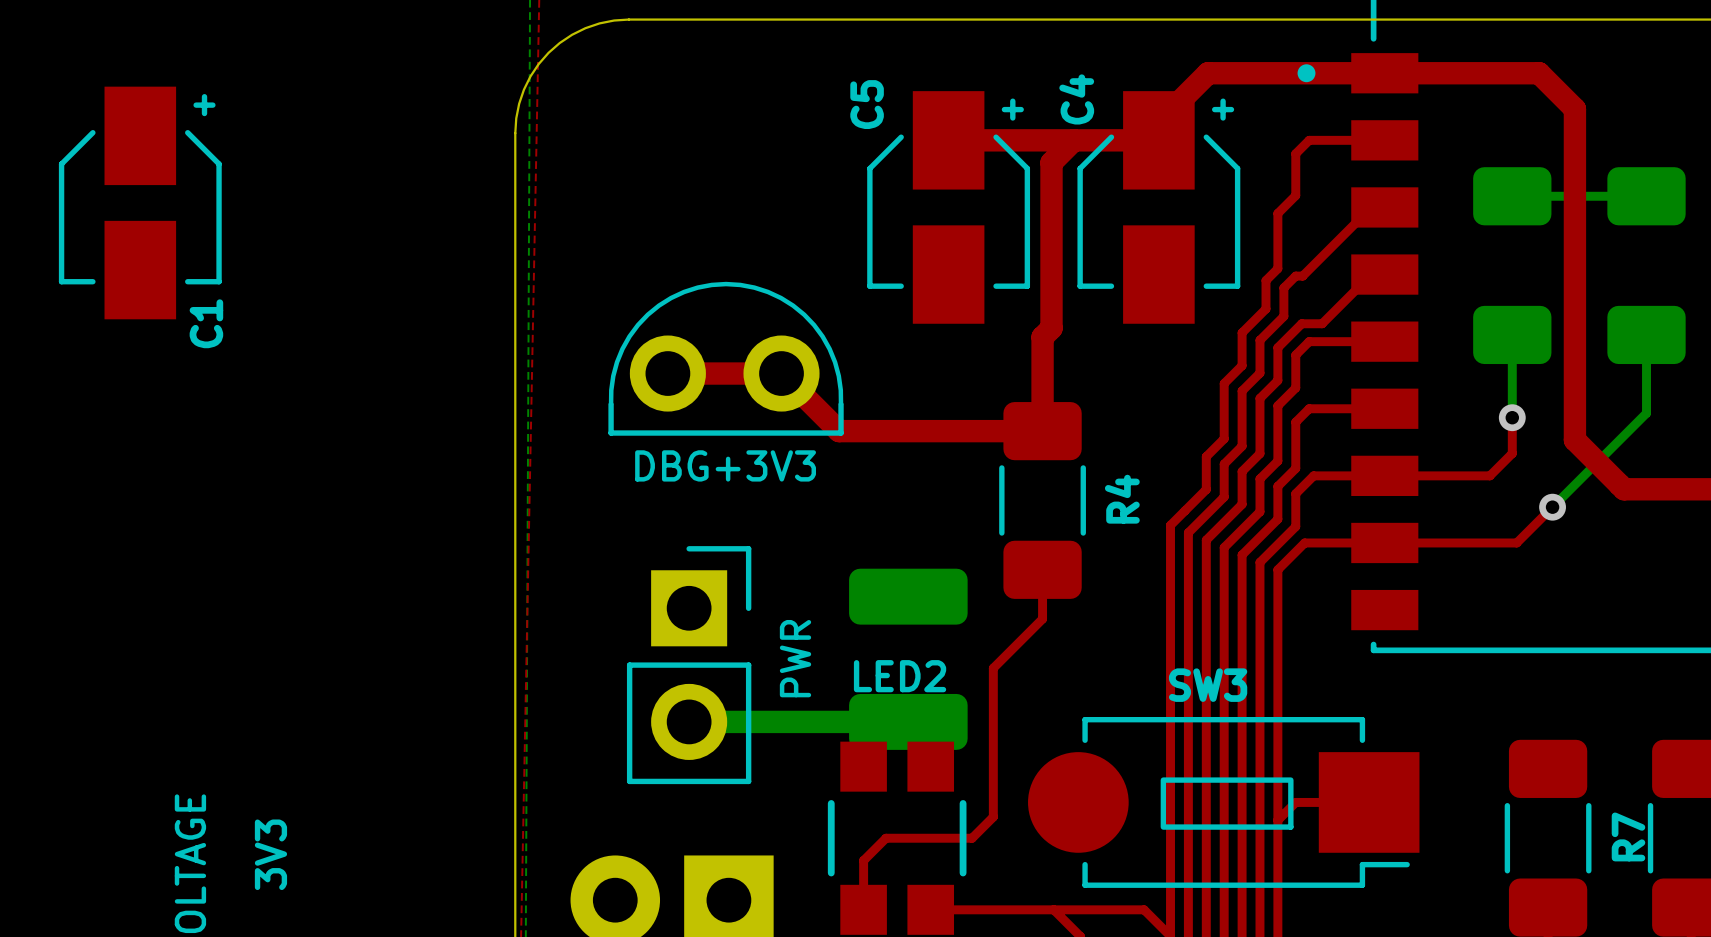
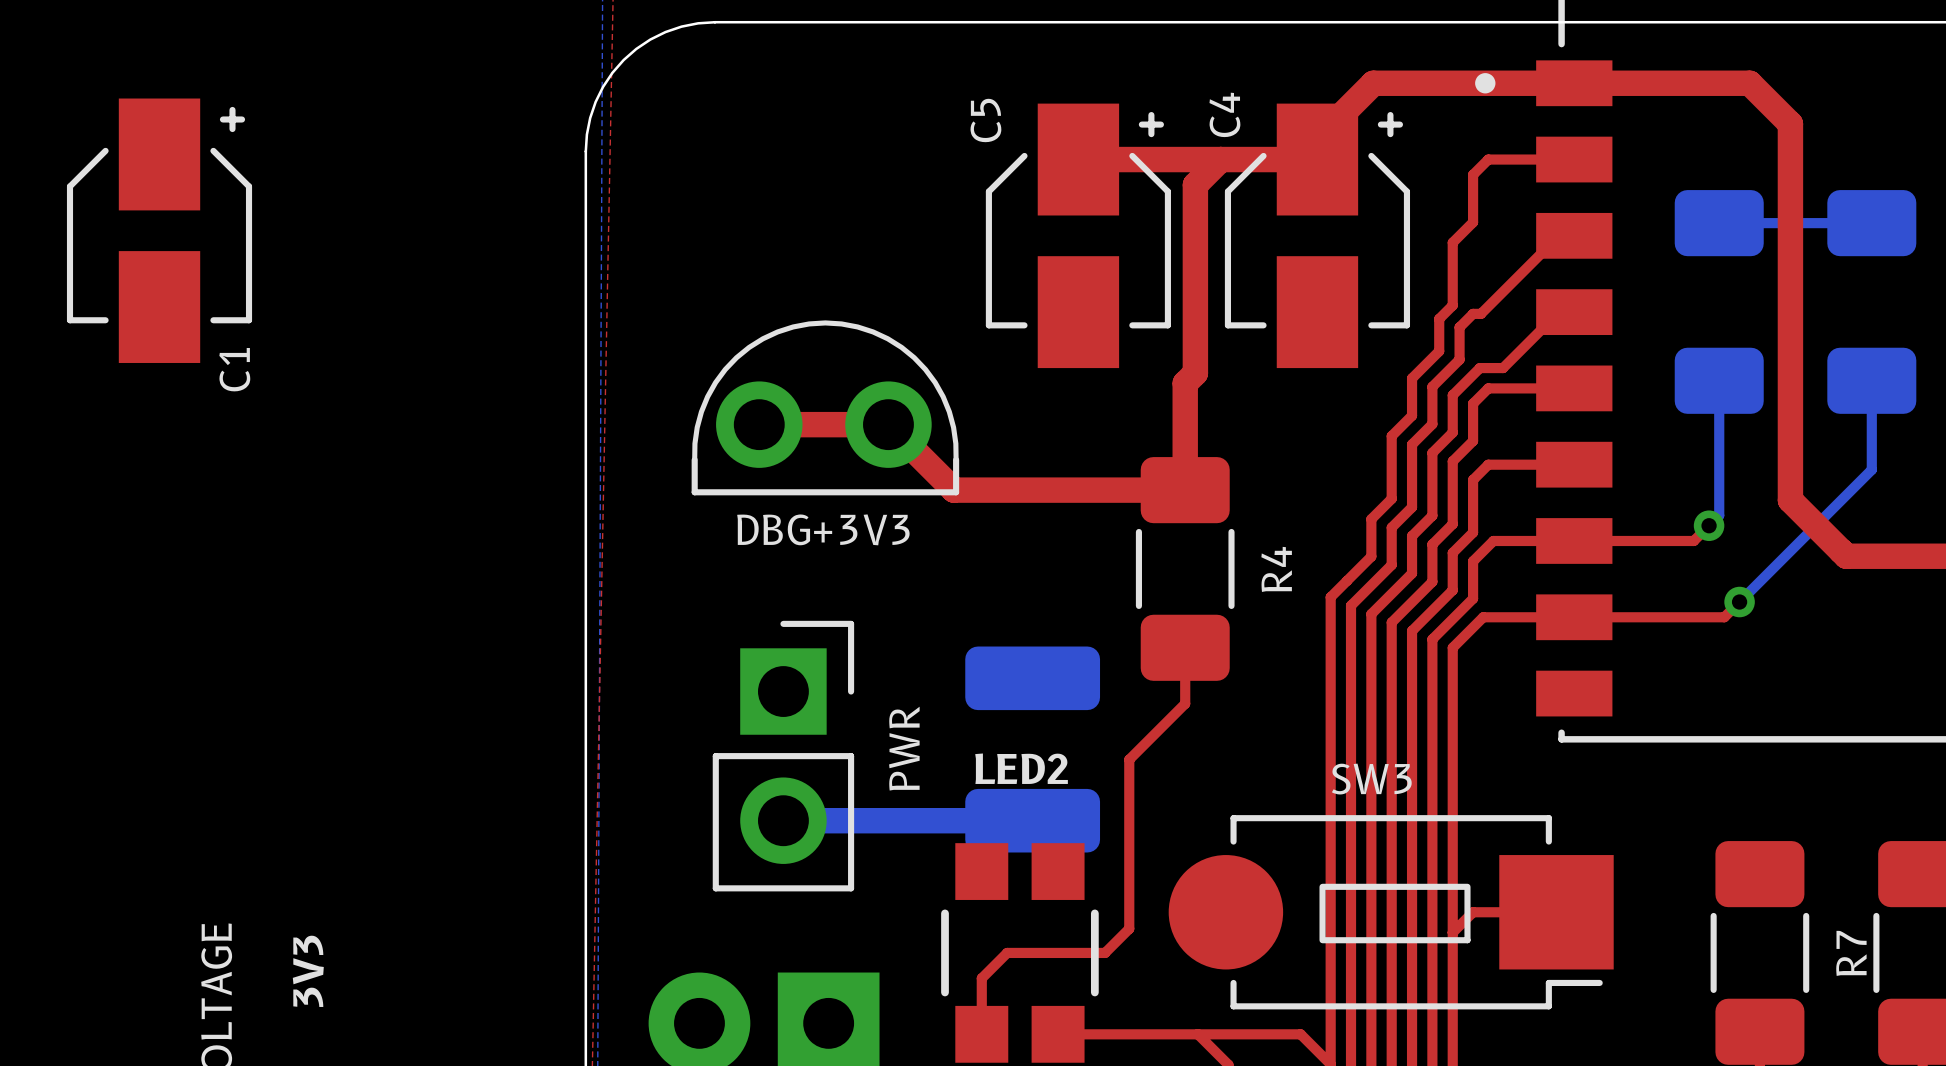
bottom track: none -> (1719, 474) (1719, 515) (1709, 525)
top track: (1512, 417) (1512, 453) (1503, 462) -> none
via: (1512, 417) -> none
via: none -> (1709, 525)
bottom track: none -> (1765, 576) (1739, 602)
top track: (1552, 507) (1530, 529) -> none
via position: (1552, 507) -> (1739, 602)

